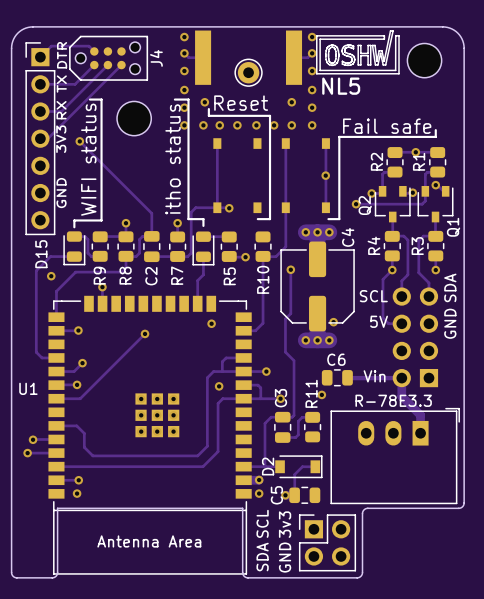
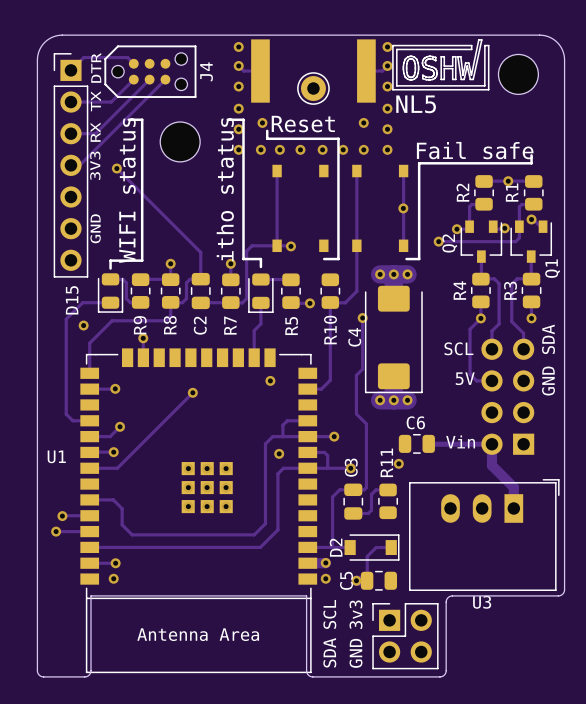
C4 name position: C4 (347, 237) -> C4 (354, 337)
C4 footprint: [280, 241, 355, 332] -> [364, 285, 423, 394]
via: (333, 322) -> none
R-78E3.3 name: R-78E3.3 (393, 400) -> U3 (482, 602)

